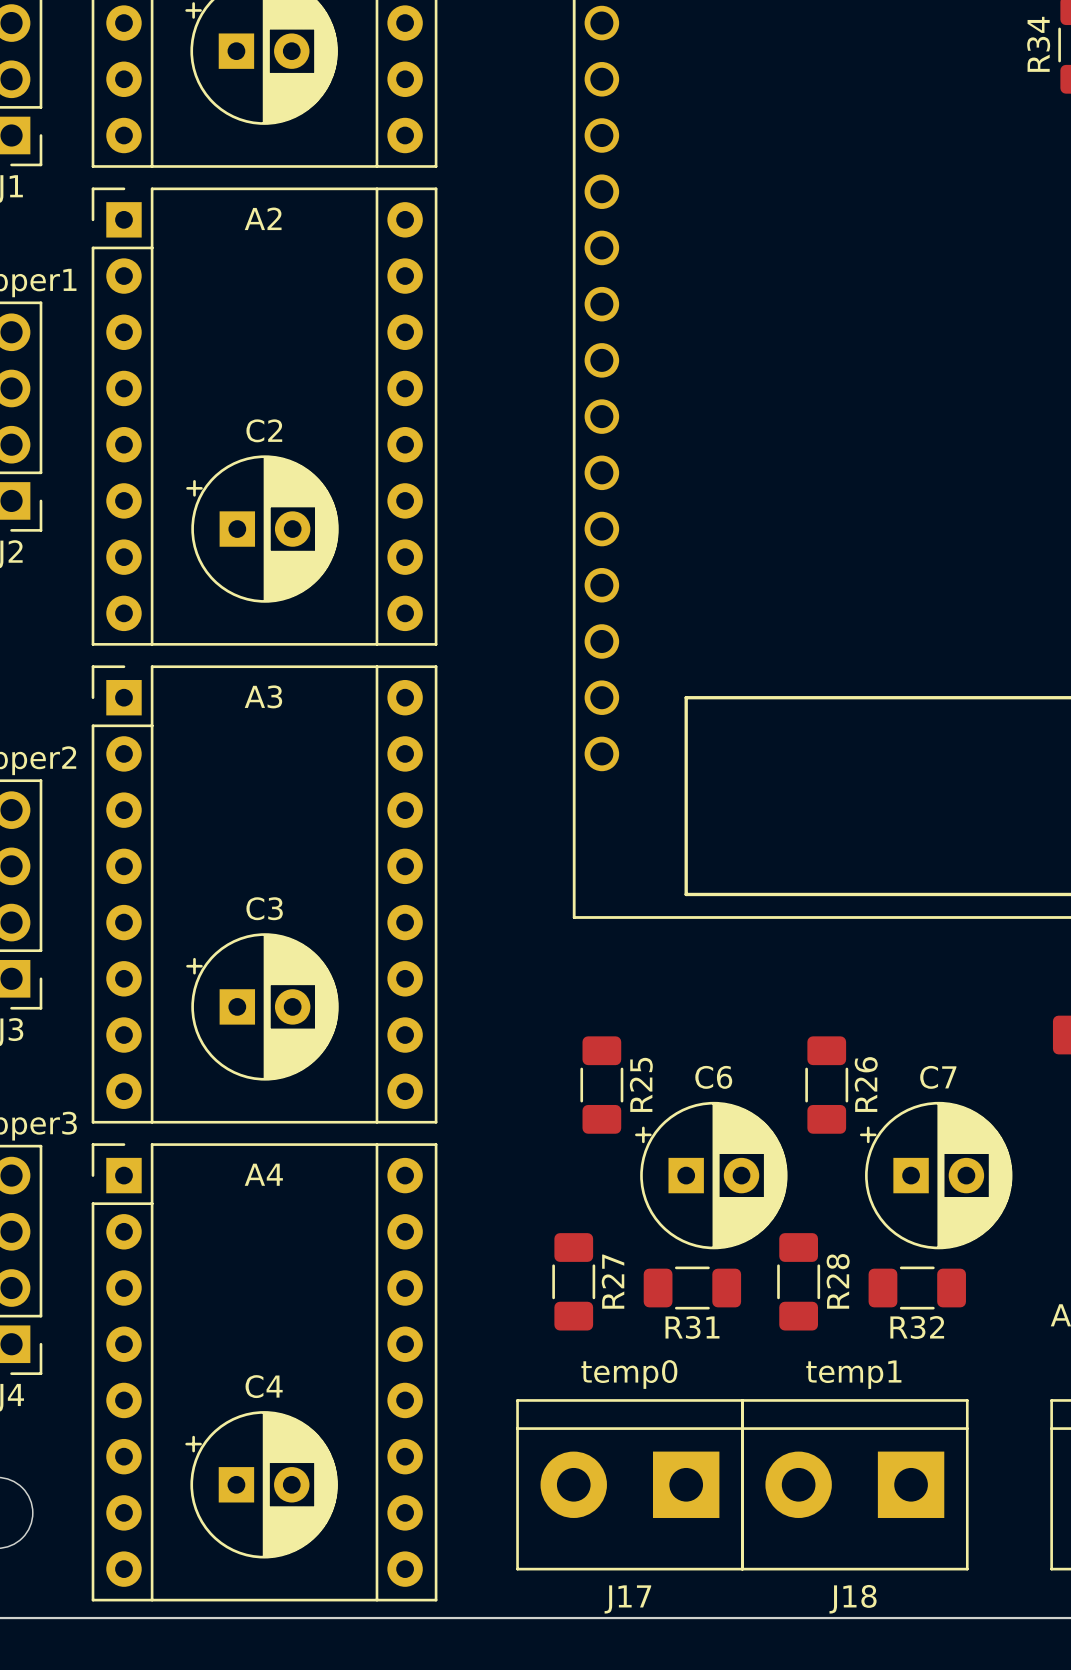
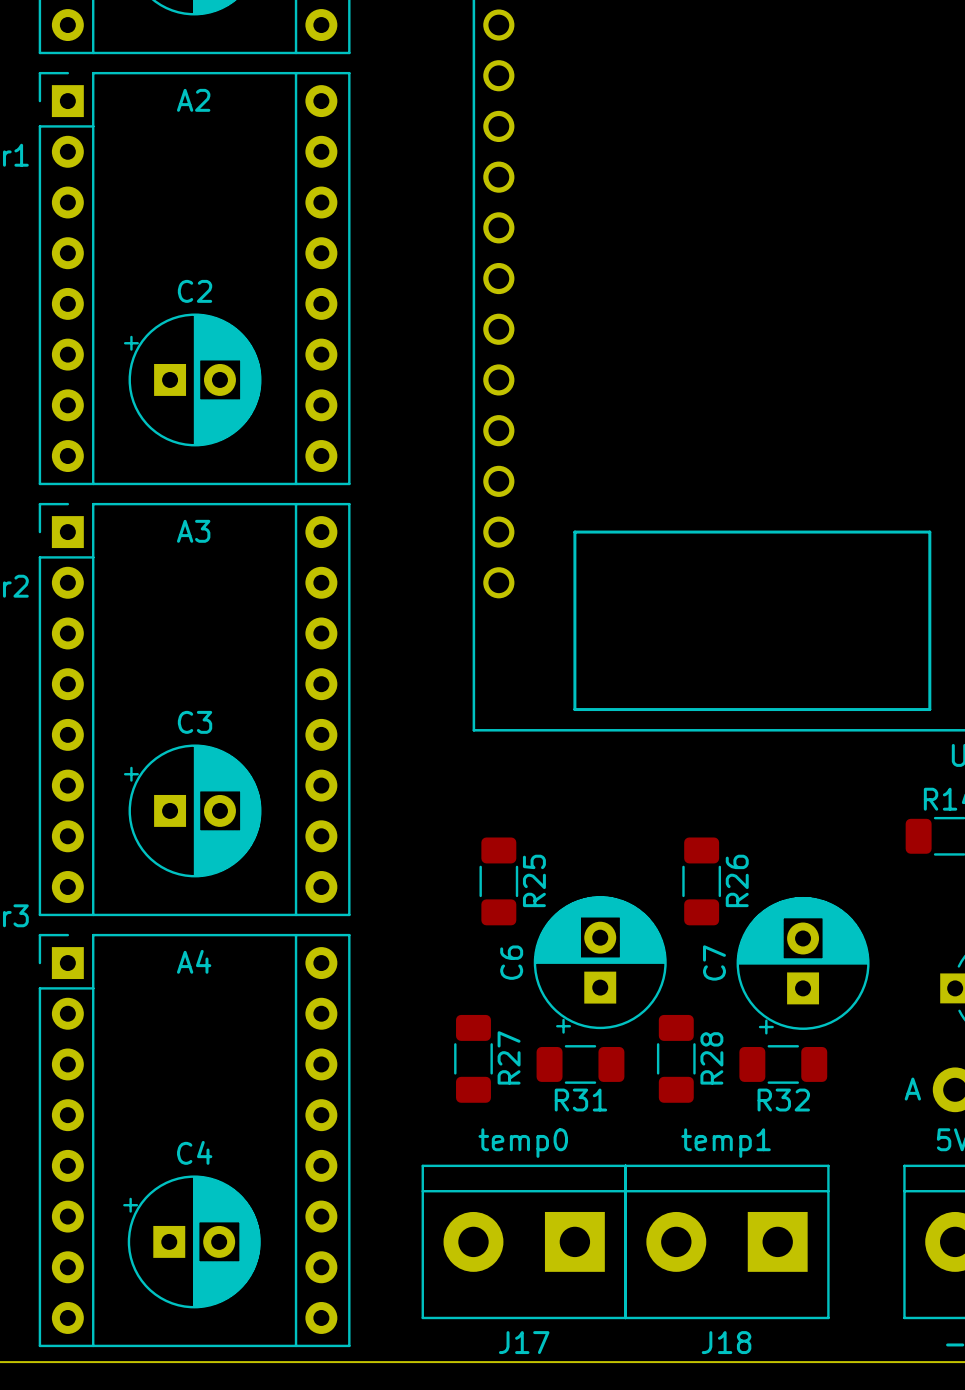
C6 rotation: 0° (711, 1175) -> 90° counterclockwise (600, 964)
C7 rotation: 0° (936, 1175) -> 90° counterclockwise (803, 965)

